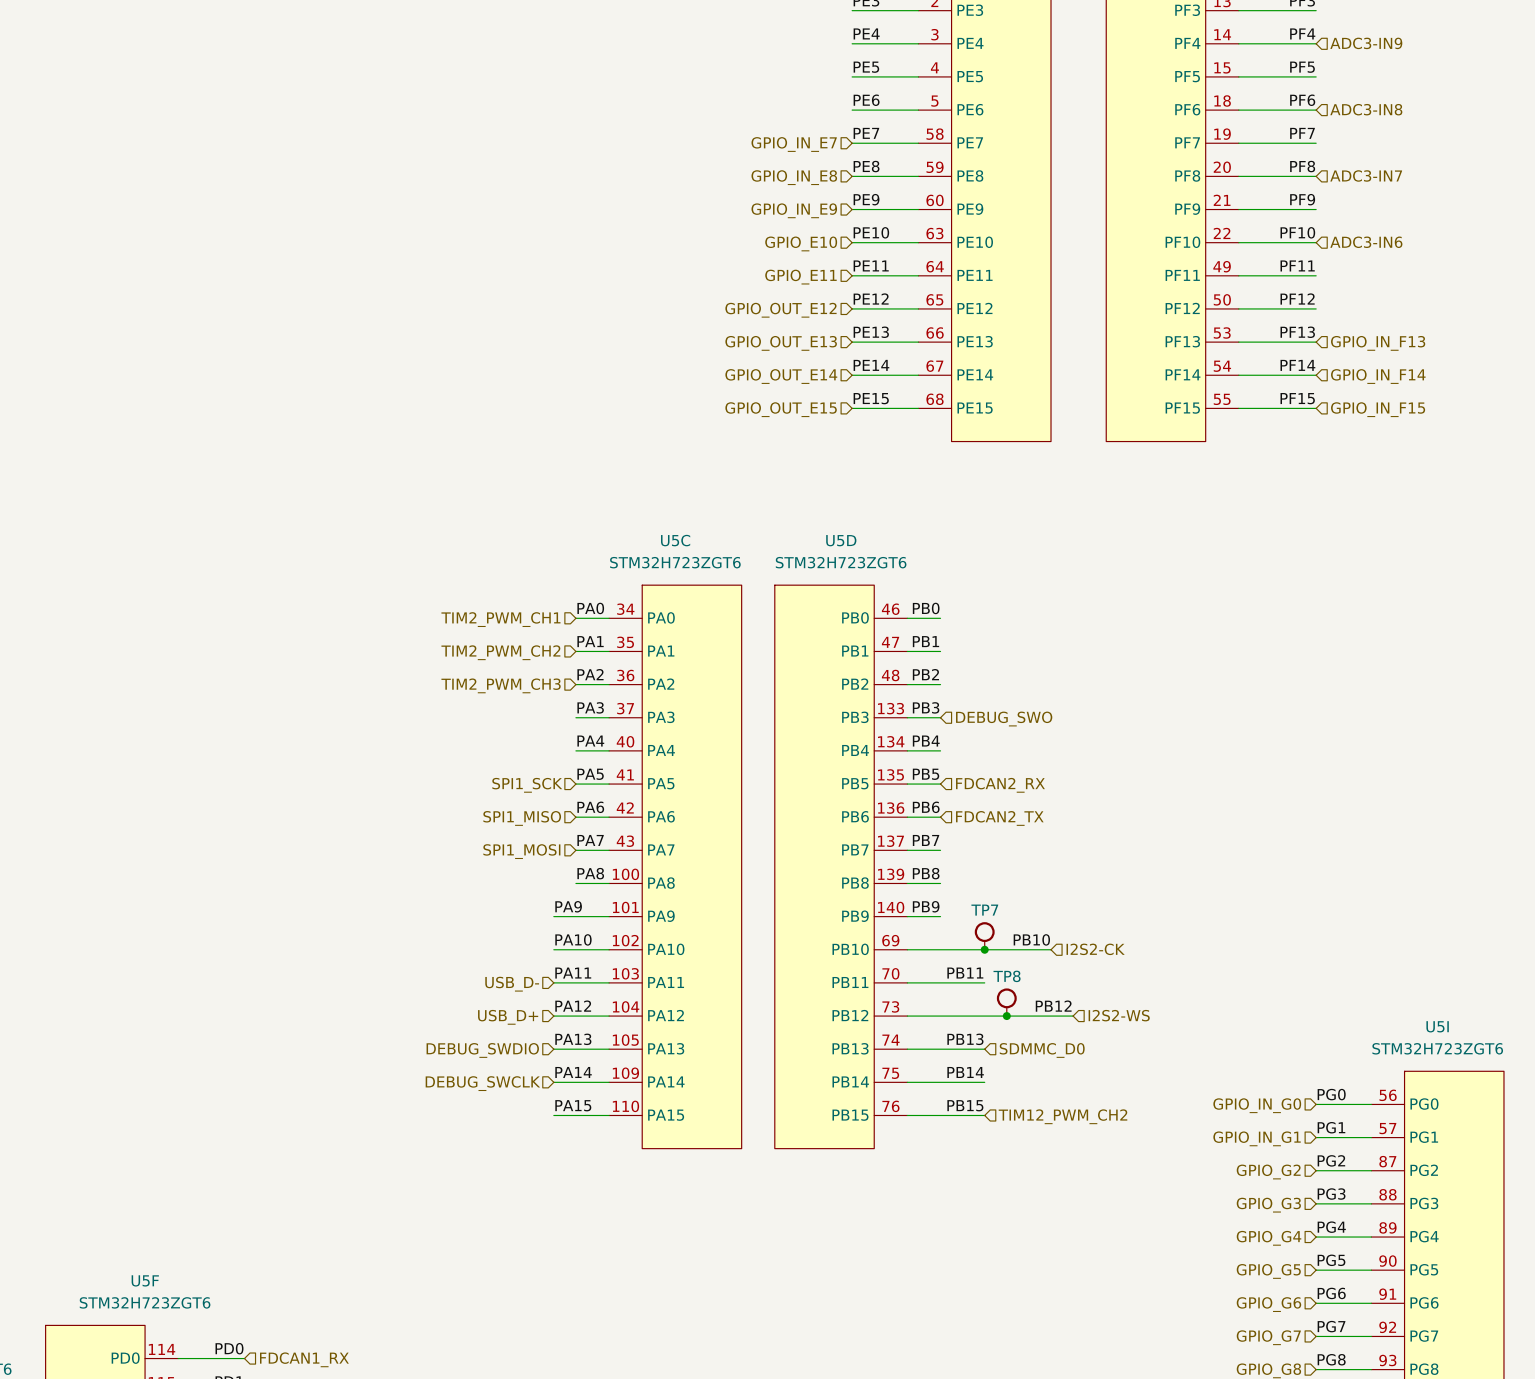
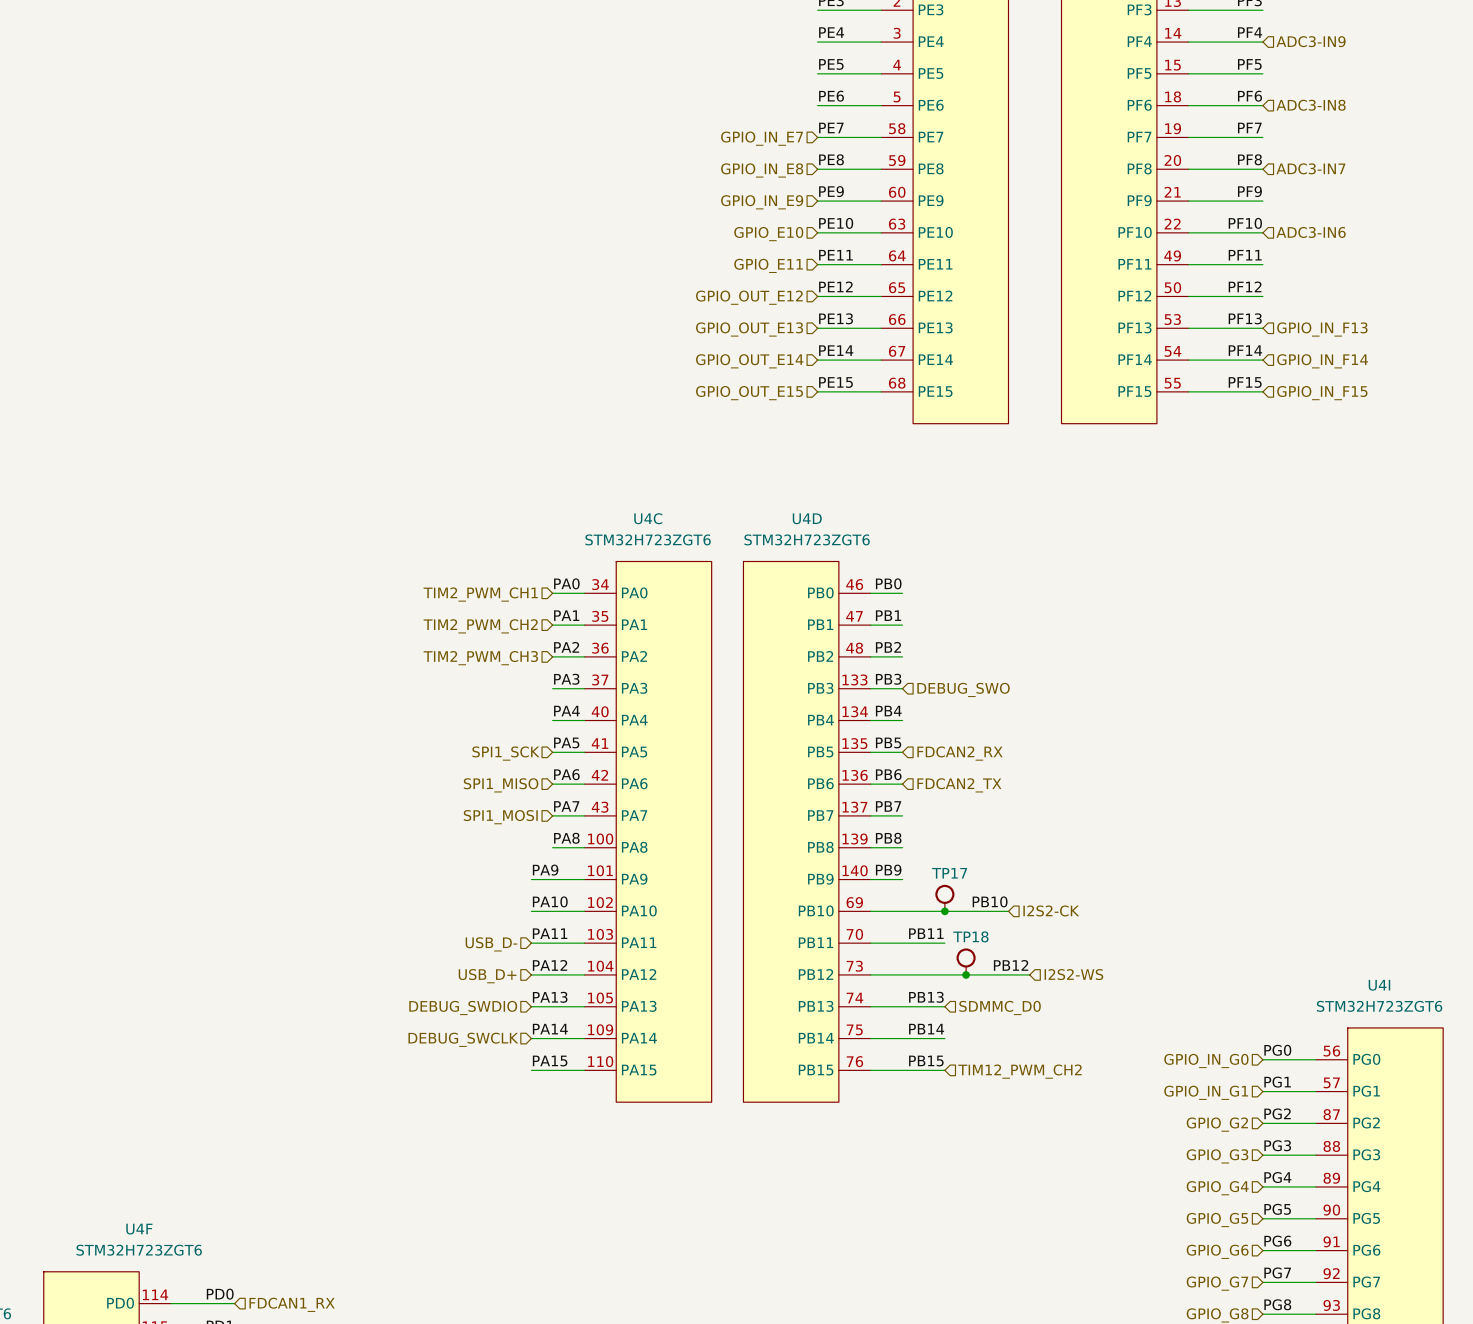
U5C name: U5C (675, 540) -> U4C (648, 518)
U5D name: U5D (841, 540) -> U4D (807, 518)
TP7 name: TP7 (984, 910) -> TP17 (949, 873)
TP8 name: TP8 (1007, 976) -> TP18 (970, 936)
U5I name: U5I (1437, 1026) -> U4I (1379, 985)
U5F name: U5F (145, 1280) -> U4F (139, 1229)

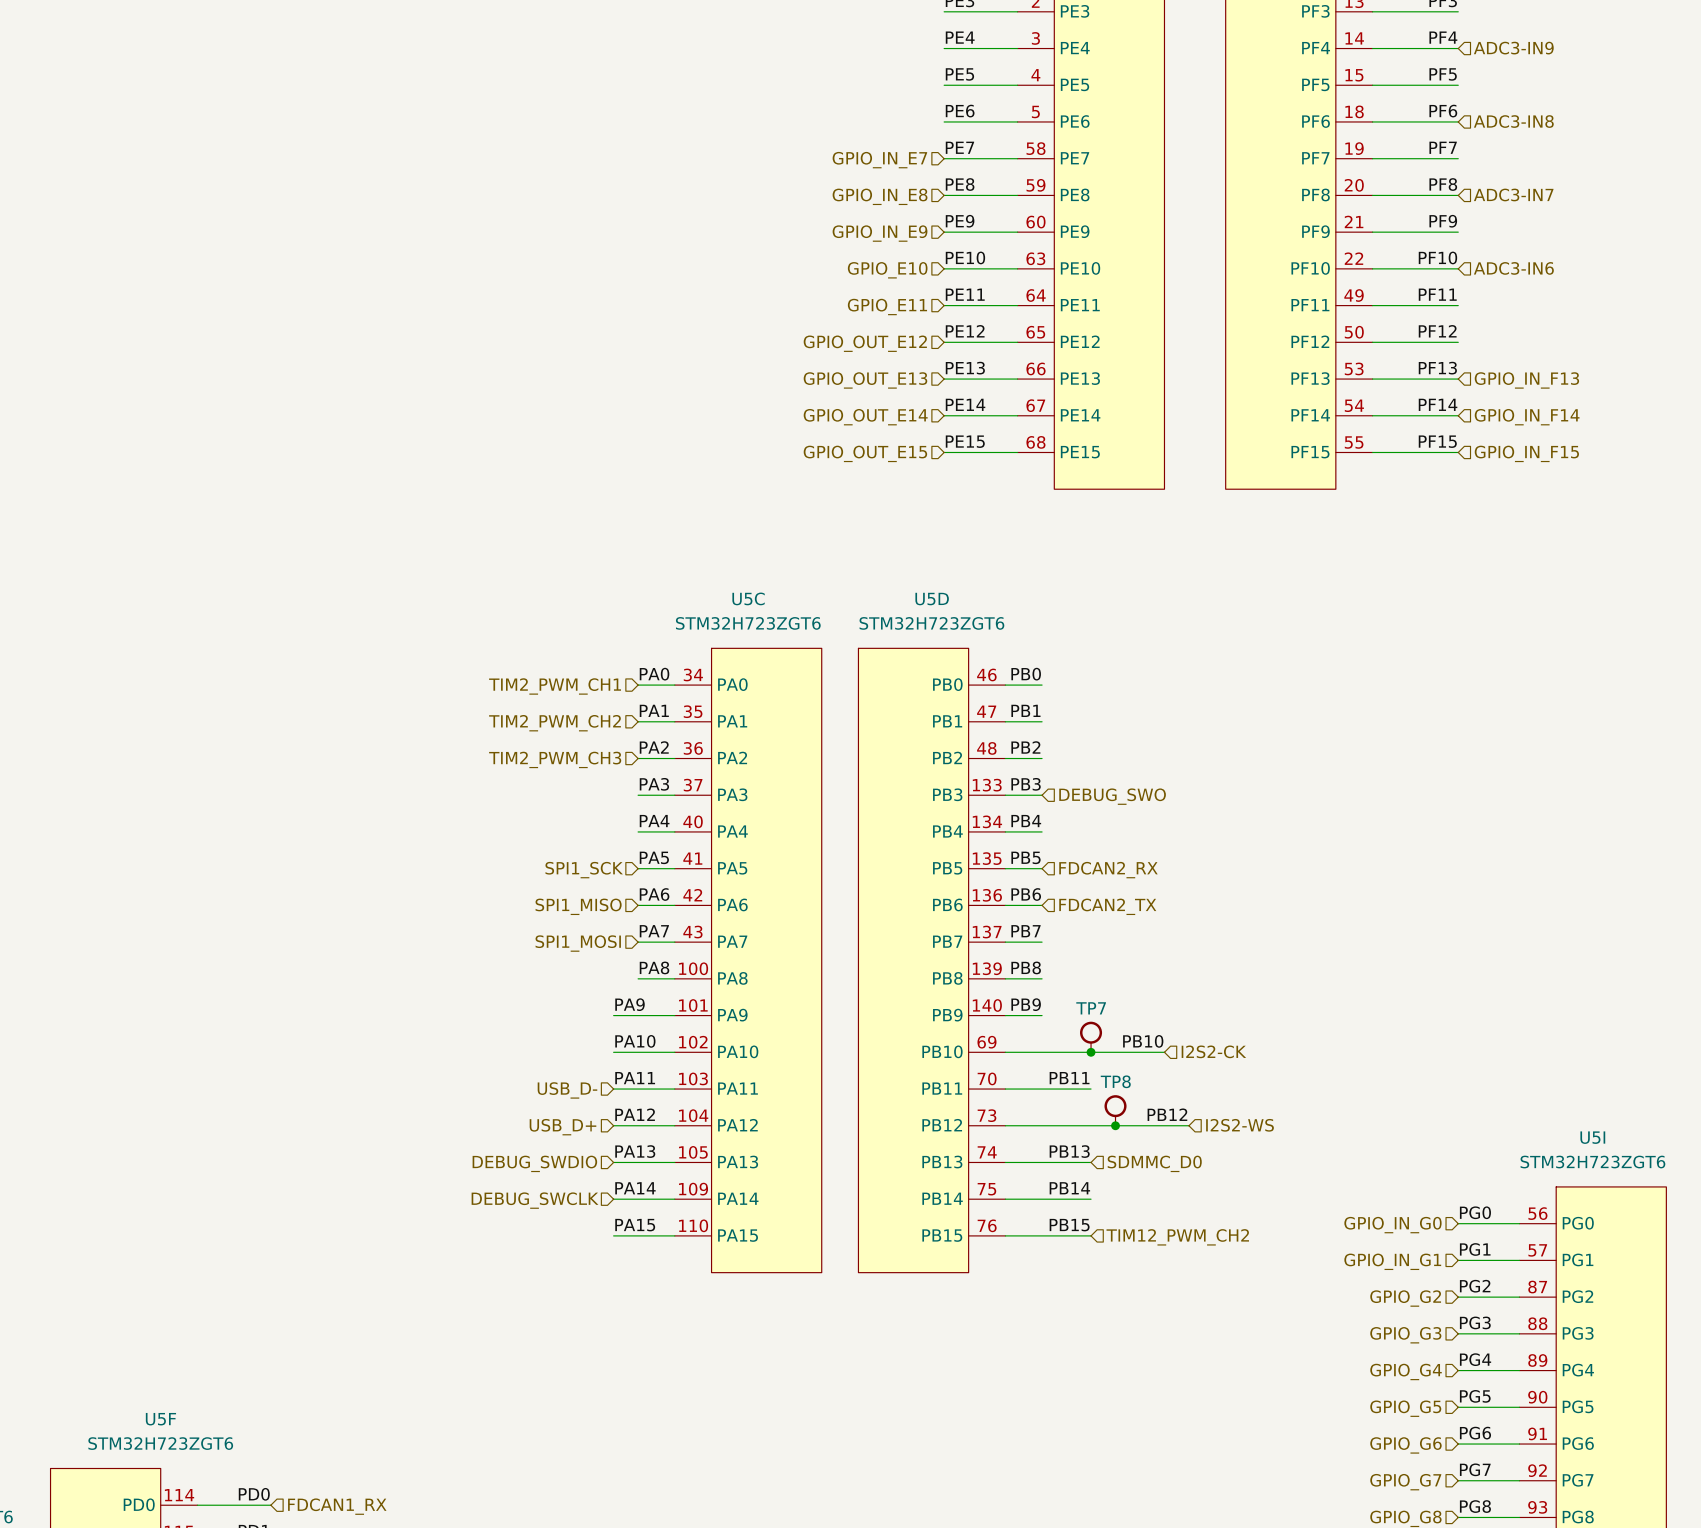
U4C name: U4C (648, 518) -> U5C (748, 598)
U4D name: U4D (807, 518) -> U5D (932, 599)
TP17 name: TP17 (949, 873) -> TP7 (1091, 1008)
TP18 name: TP18 (970, 936) -> TP8 (1115, 1081)
U4I name: U4I (1379, 985) -> U5I (1592, 1137)
U4F name: U4F (139, 1229) -> U5F (160, 1419)

